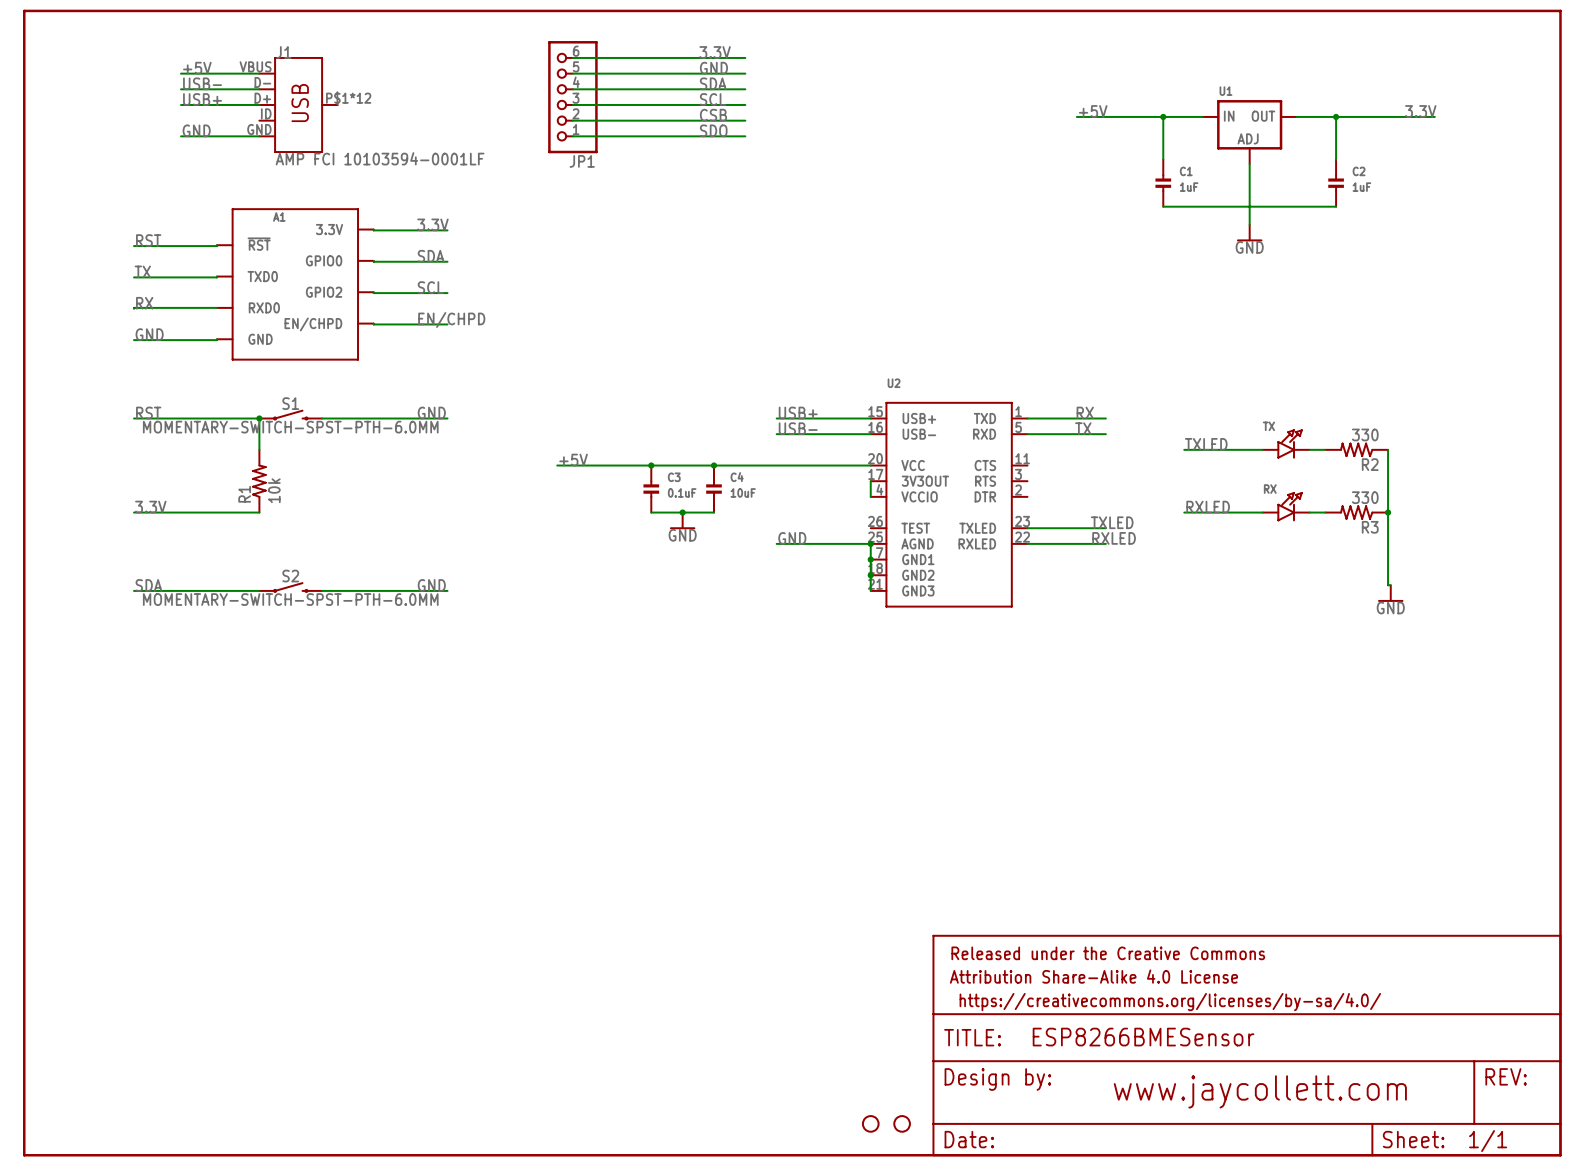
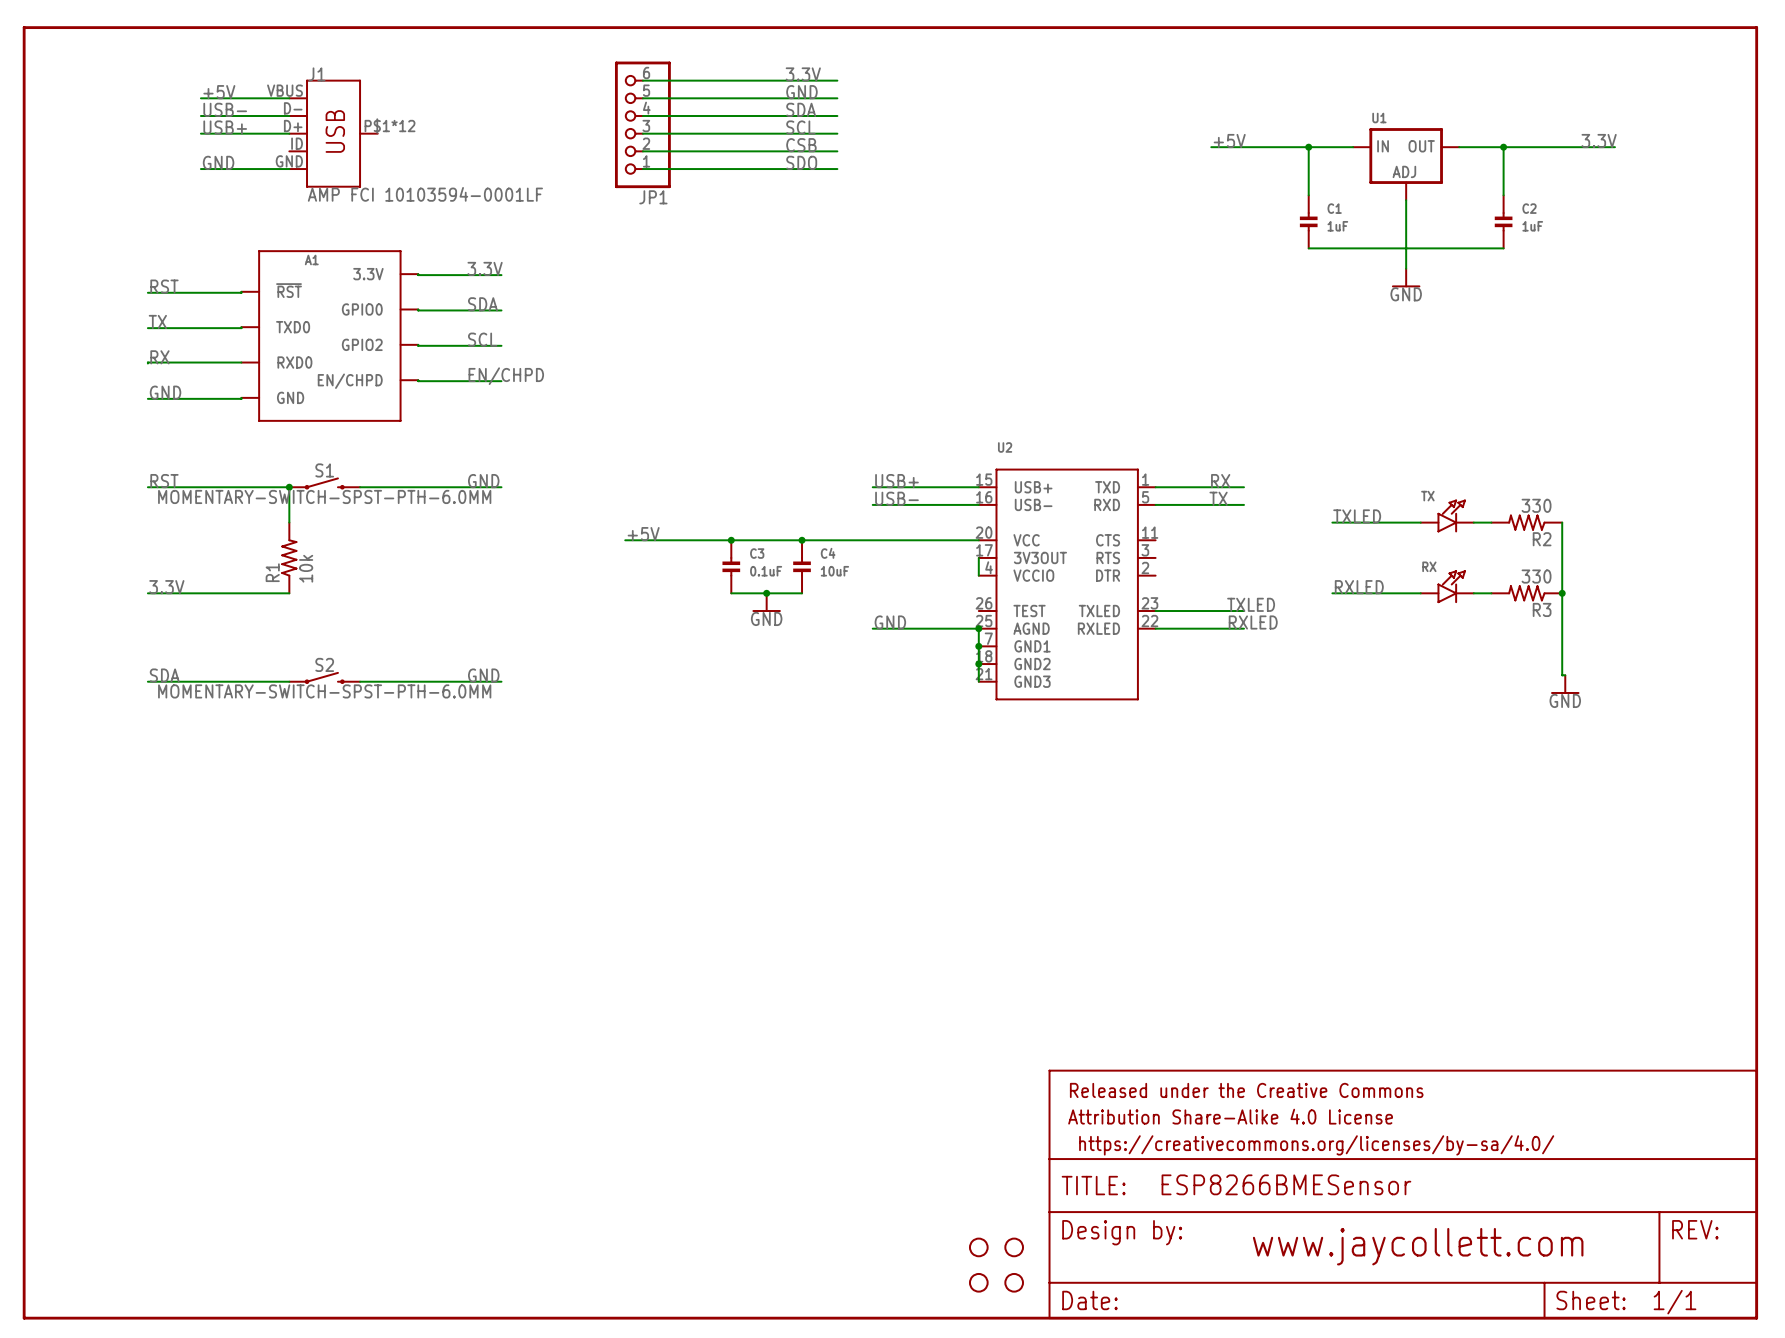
part: none -> (978, 1247)
part: none -> (1014, 1247)

